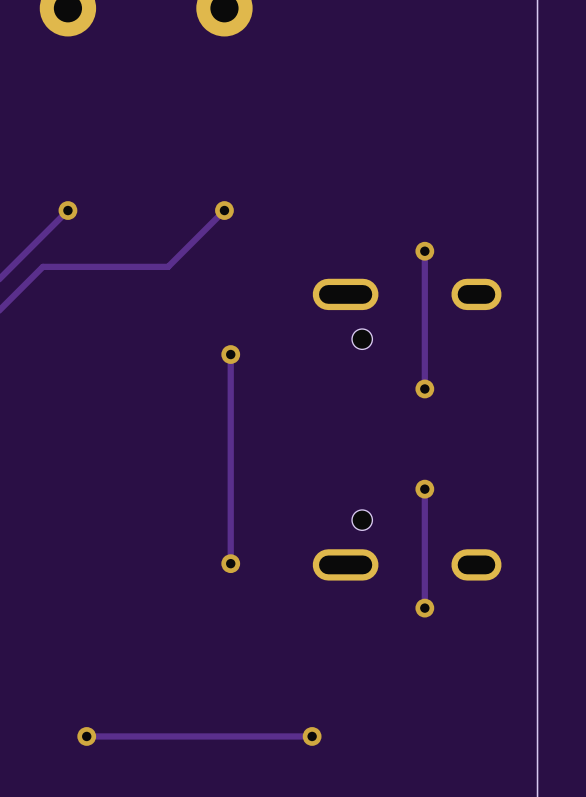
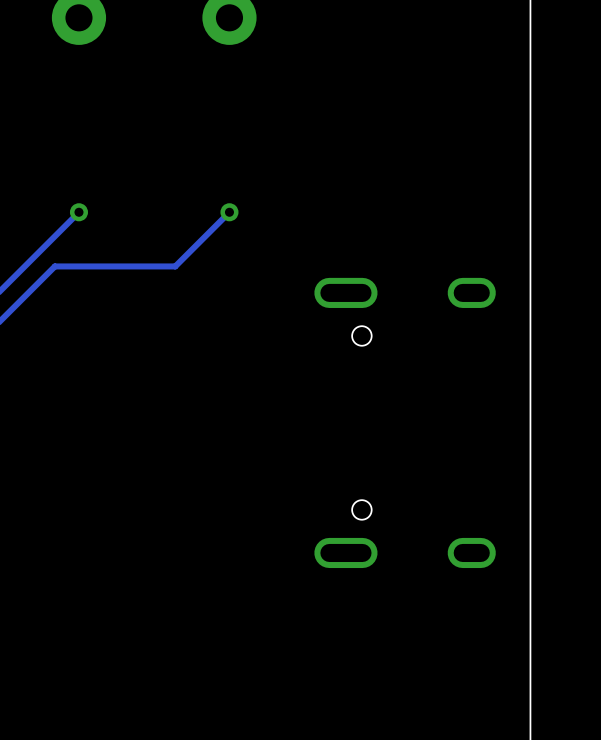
track: (424, 251) (424, 388) -> none
via: (424, 251) -> none
track: (230, 354) (230, 563) -> none
via: (230, 354) -> none
via: (424, 388) -> none
track: (424, 489) (424, 608) -> none
via: (424, 489) -> none
via: (230, 563) -> none
via: (424, 608) -> none
via: (86, 736) -> none
track: (312, 736) (86, 736) -> none
via: (312, 736) -> none

